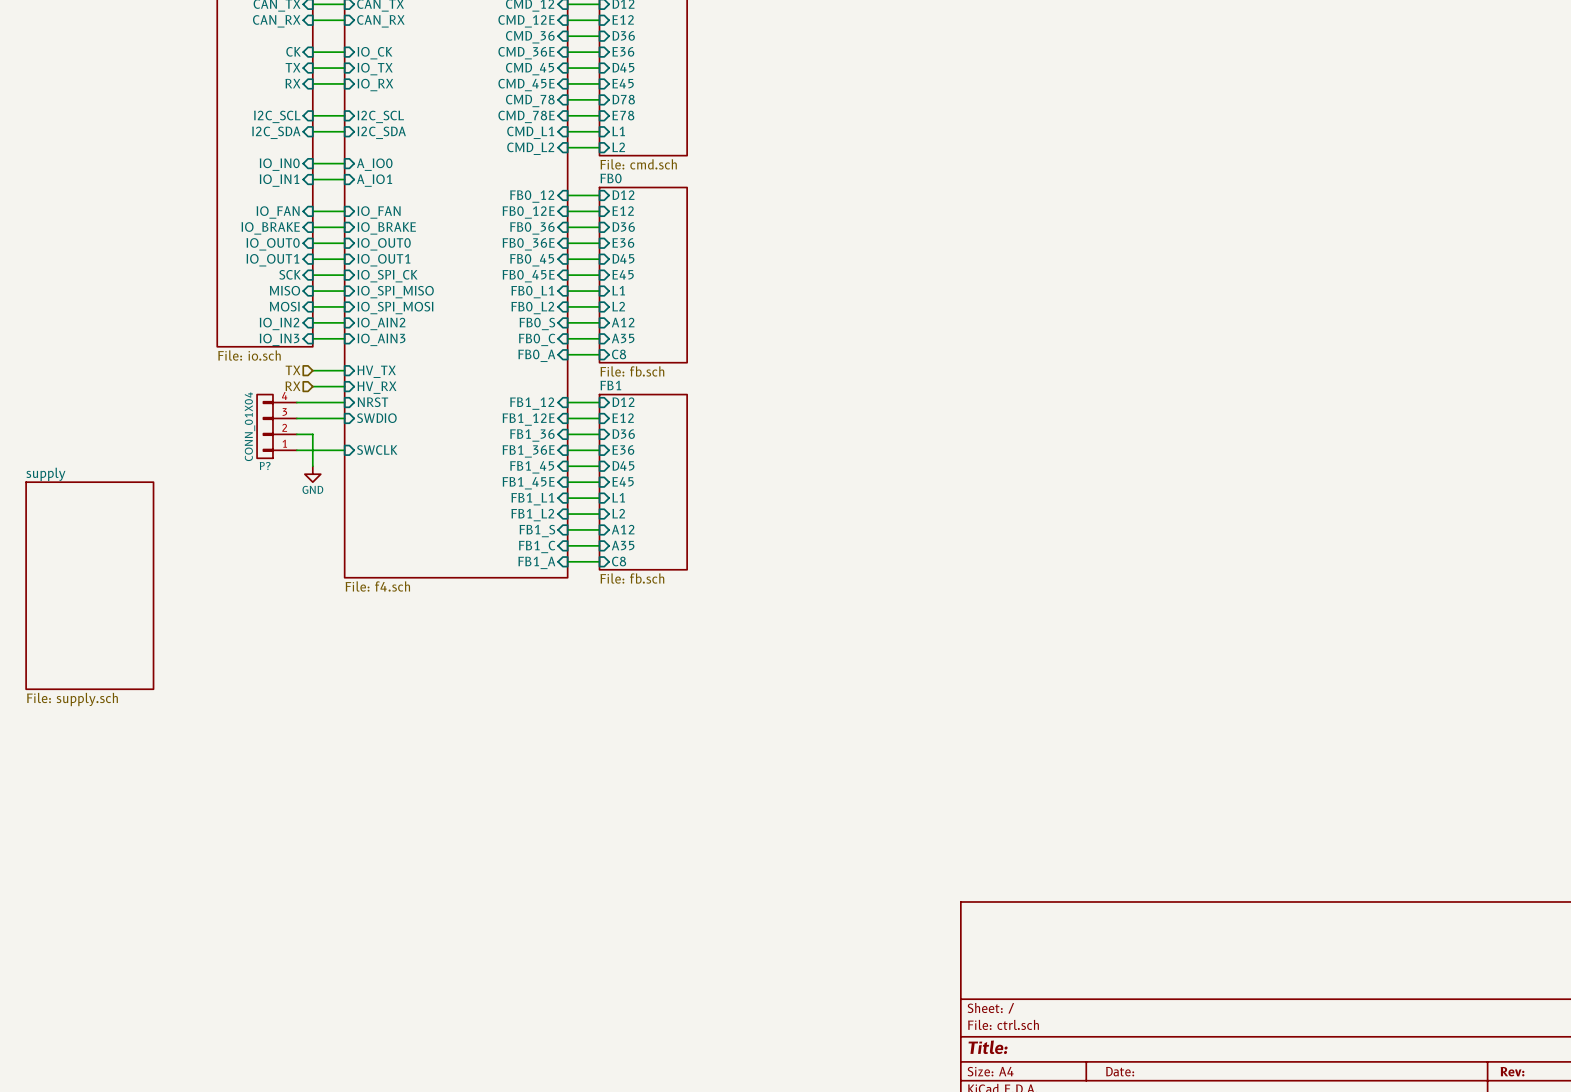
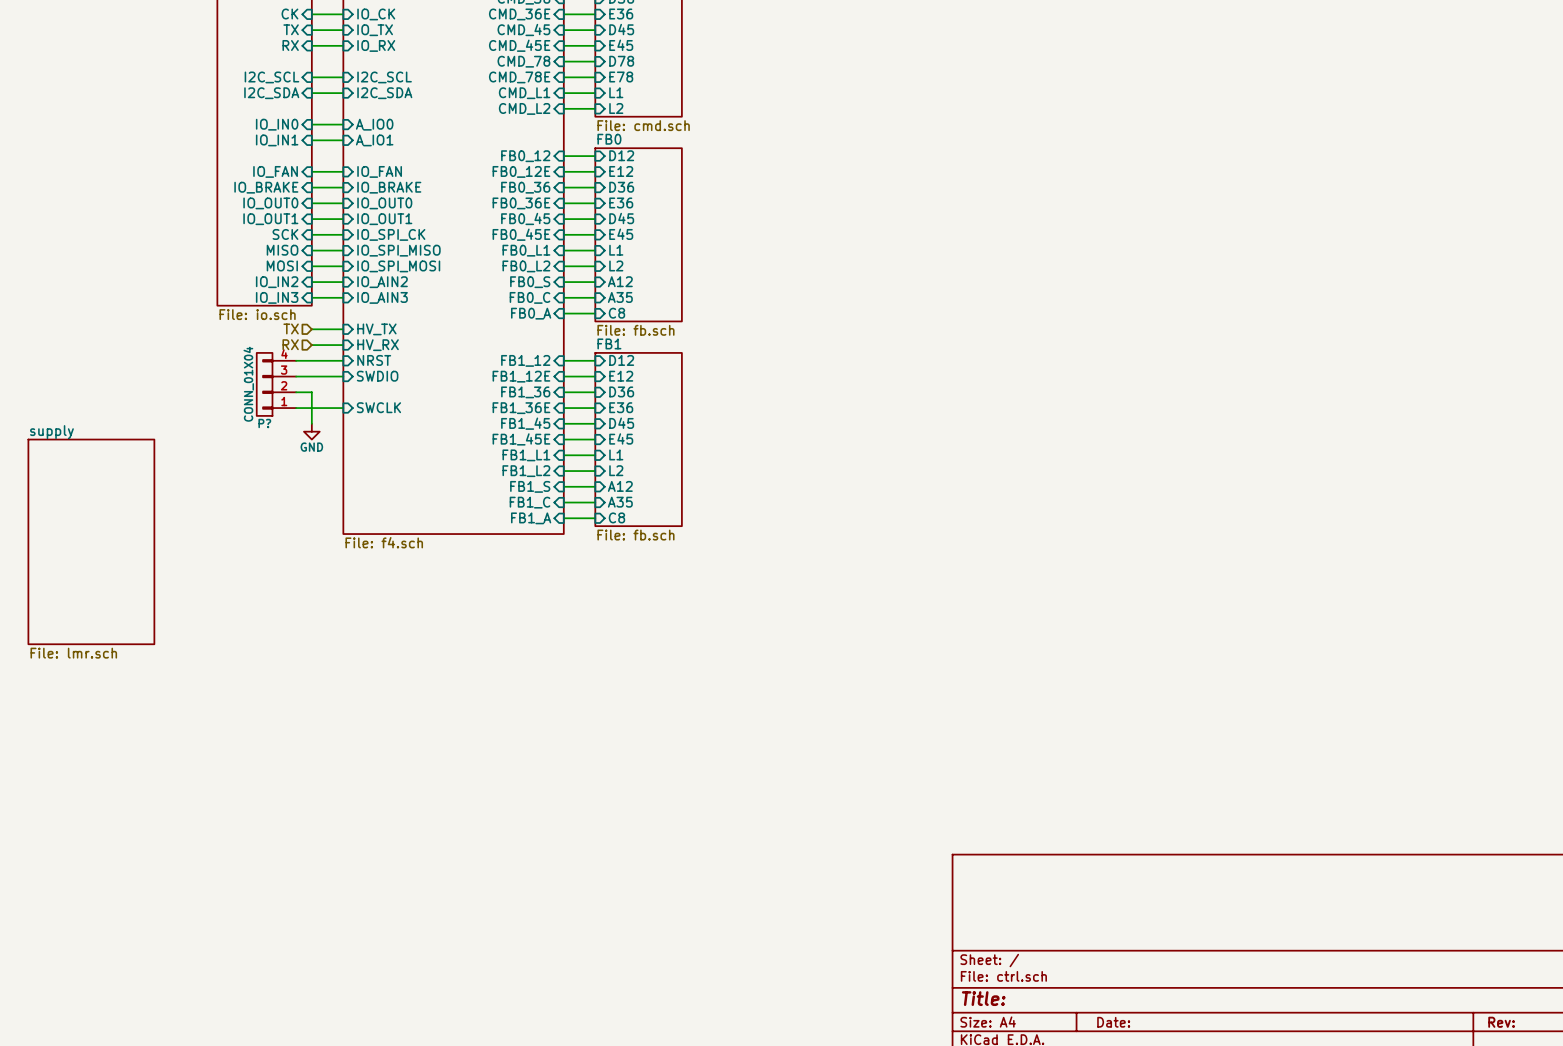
sheet supply value: File: supply.sch (72, 699) -> File: lmr.sch (73, 653)

